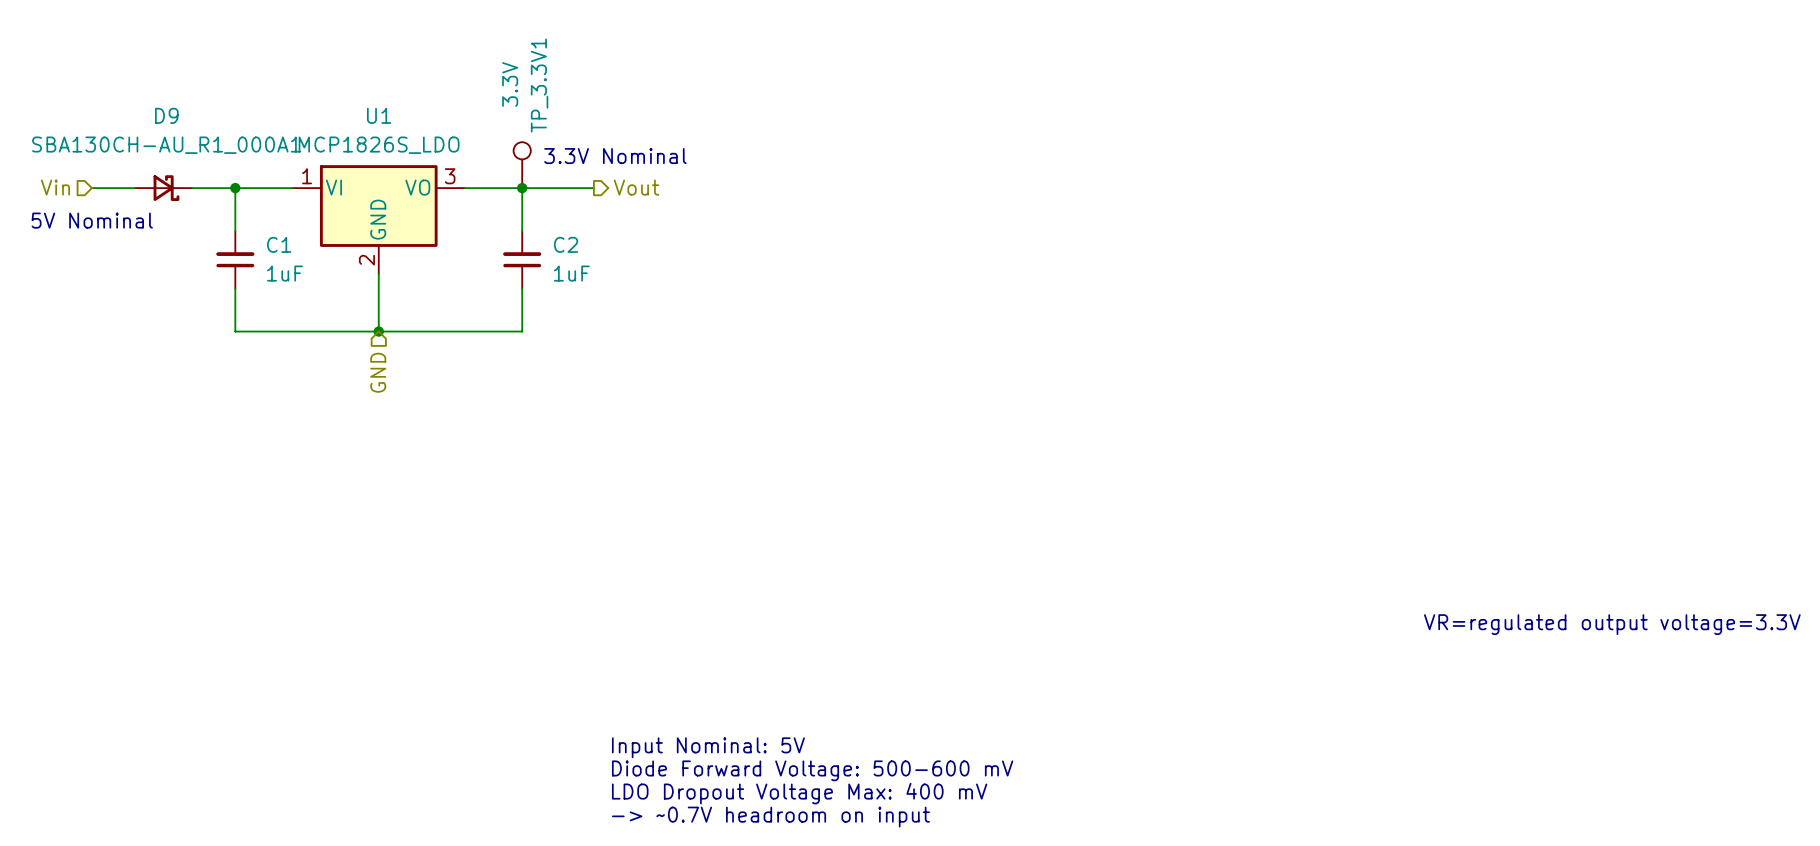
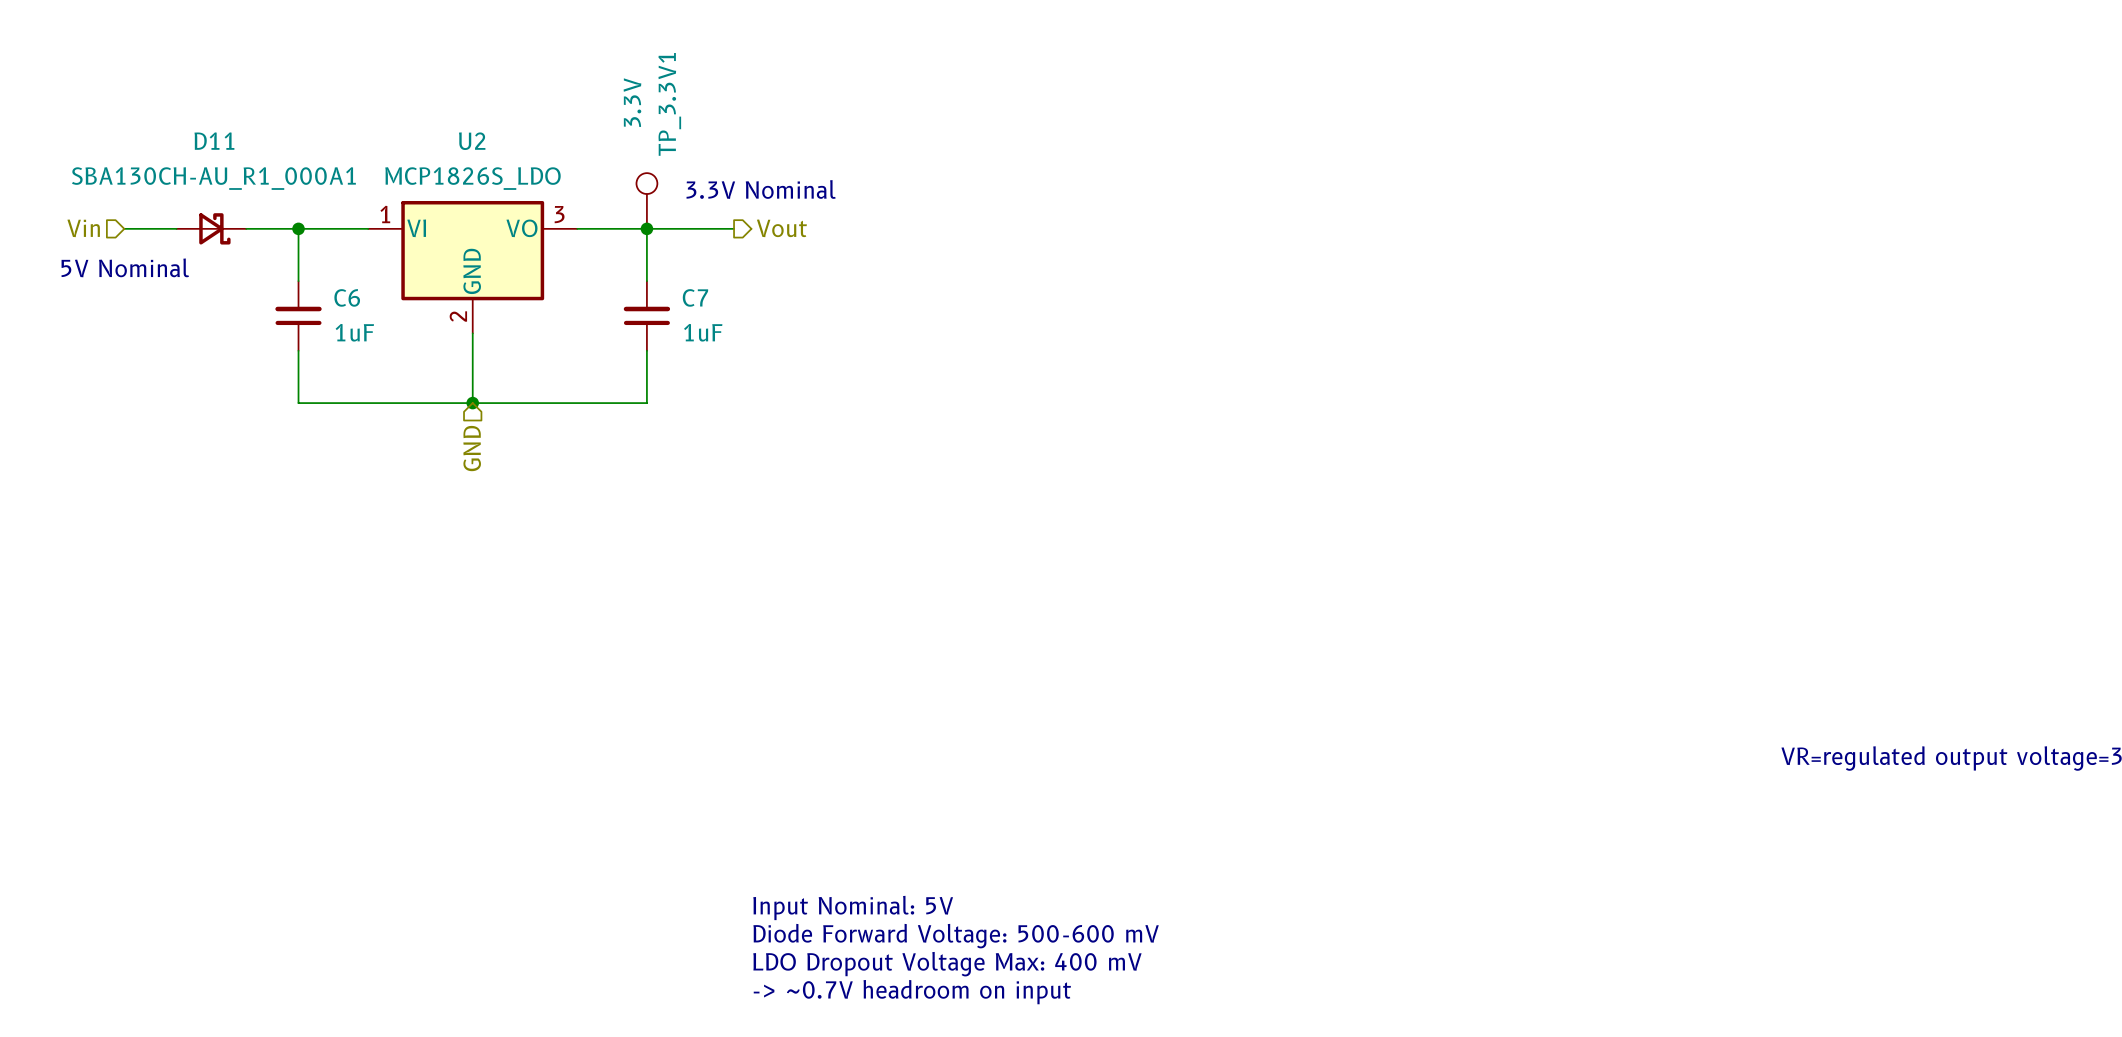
D9 name: D9 (166, 115) -> D11 (214, 141)
U1 name: U1 (379, 115) -> U2 (472, 141)
C1 name: C1 (279, 244) -> C6 (347, 297)
C2 name: C2 (566, 244) -> C7 (695, 297)

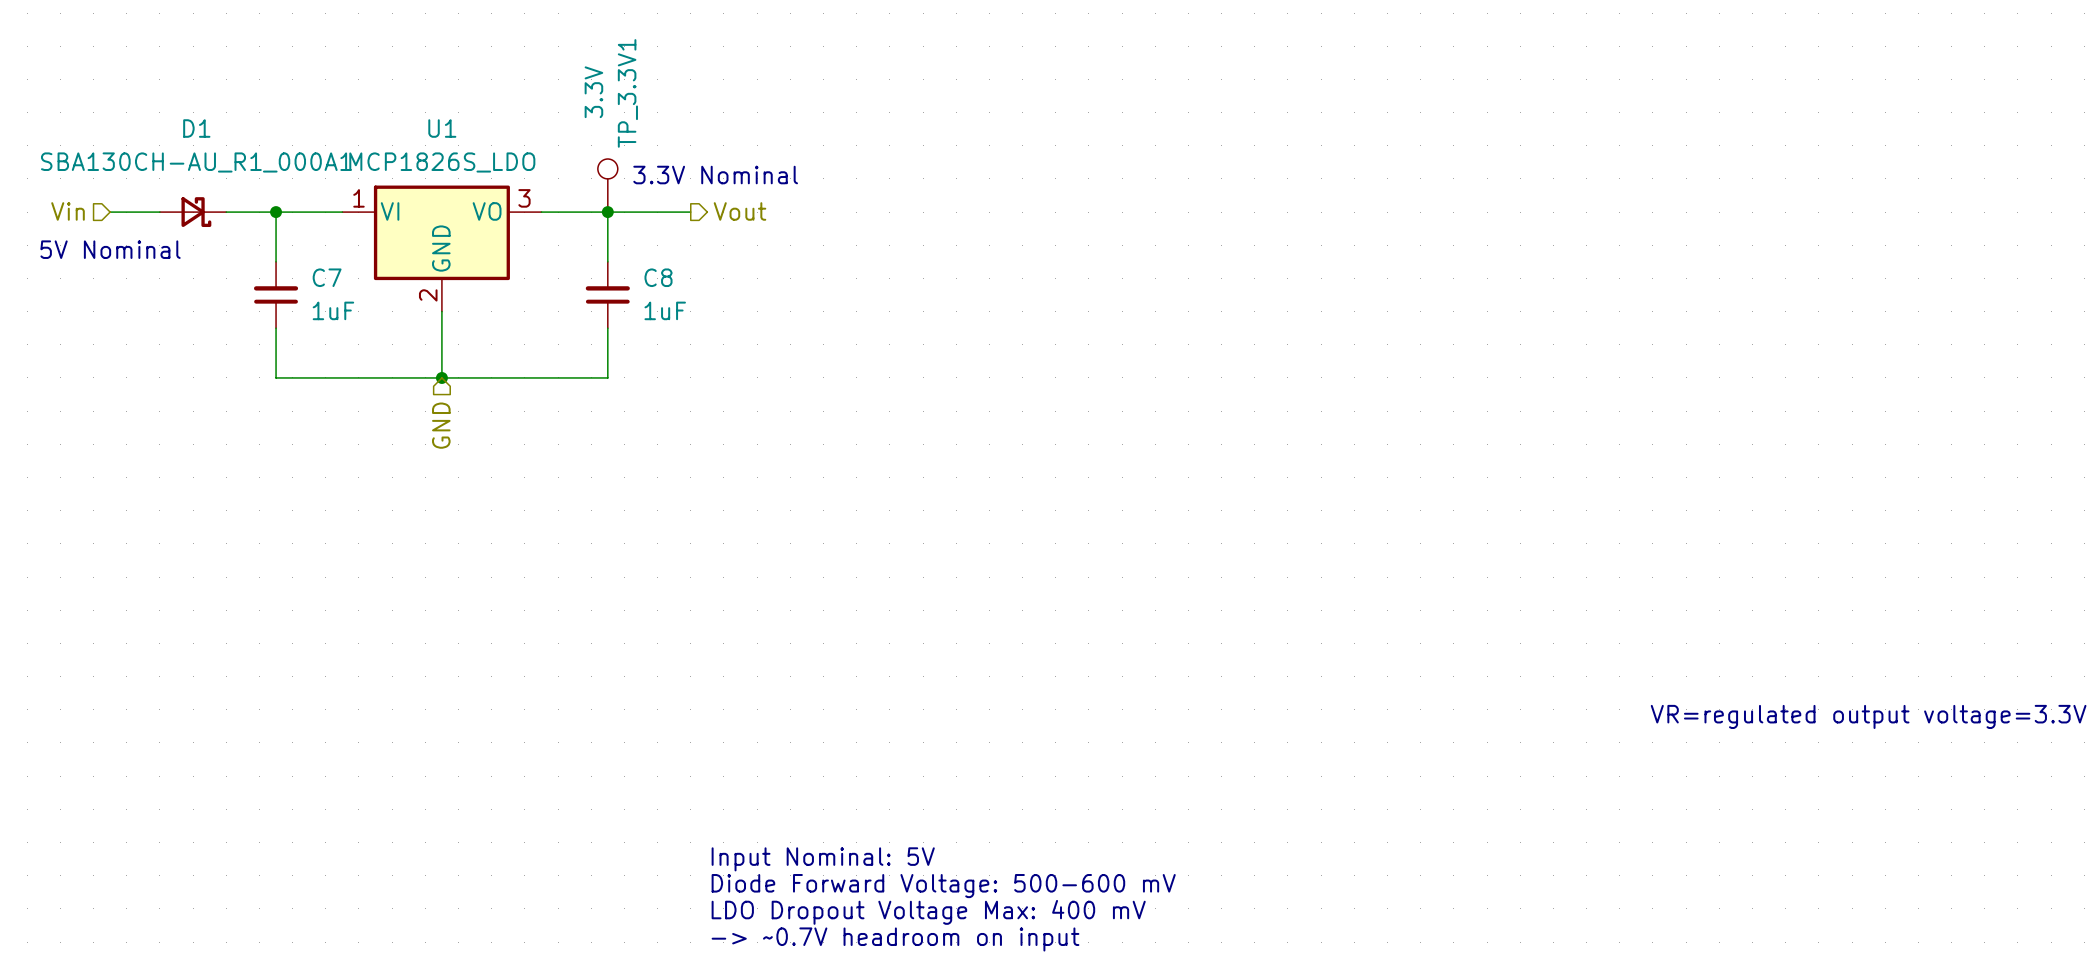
D11 name: D11 (214, 141) -> D1 (196, 128)
U2 name: U2 (472, 141) -> U1 (442, 128)
C6 name: C6 (347, 297) -> C7 (327, 277)
C7 name: C7 (695, 297) -> C8 (658, 277)

